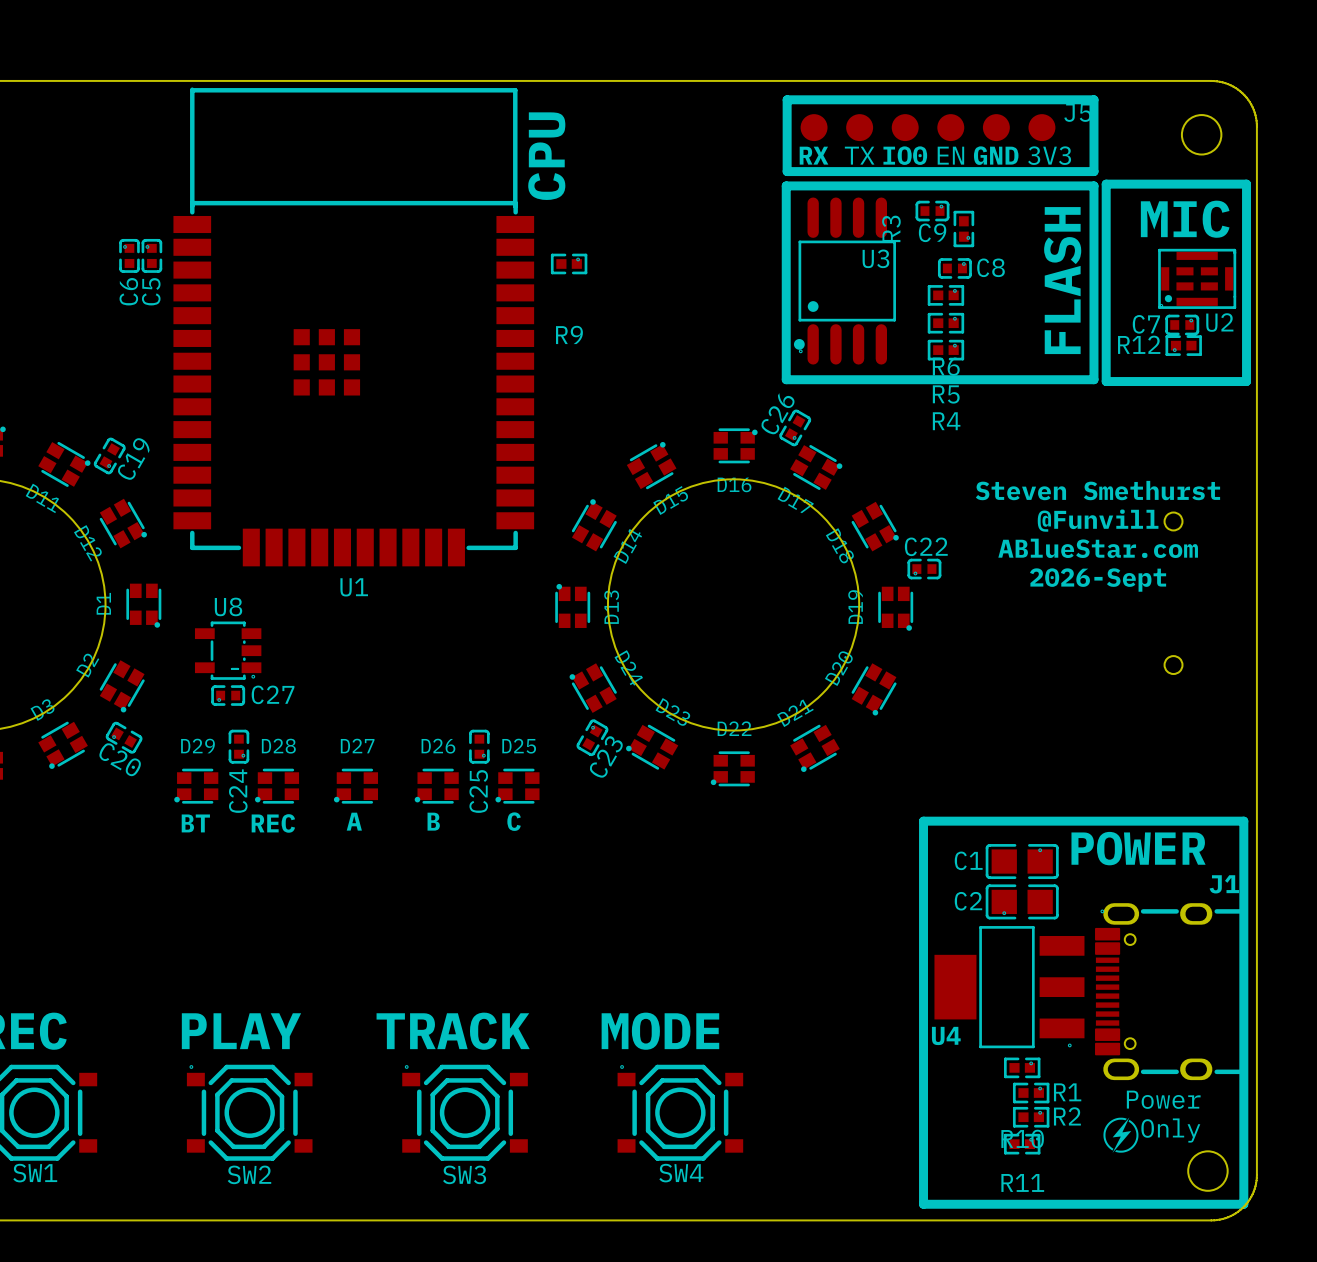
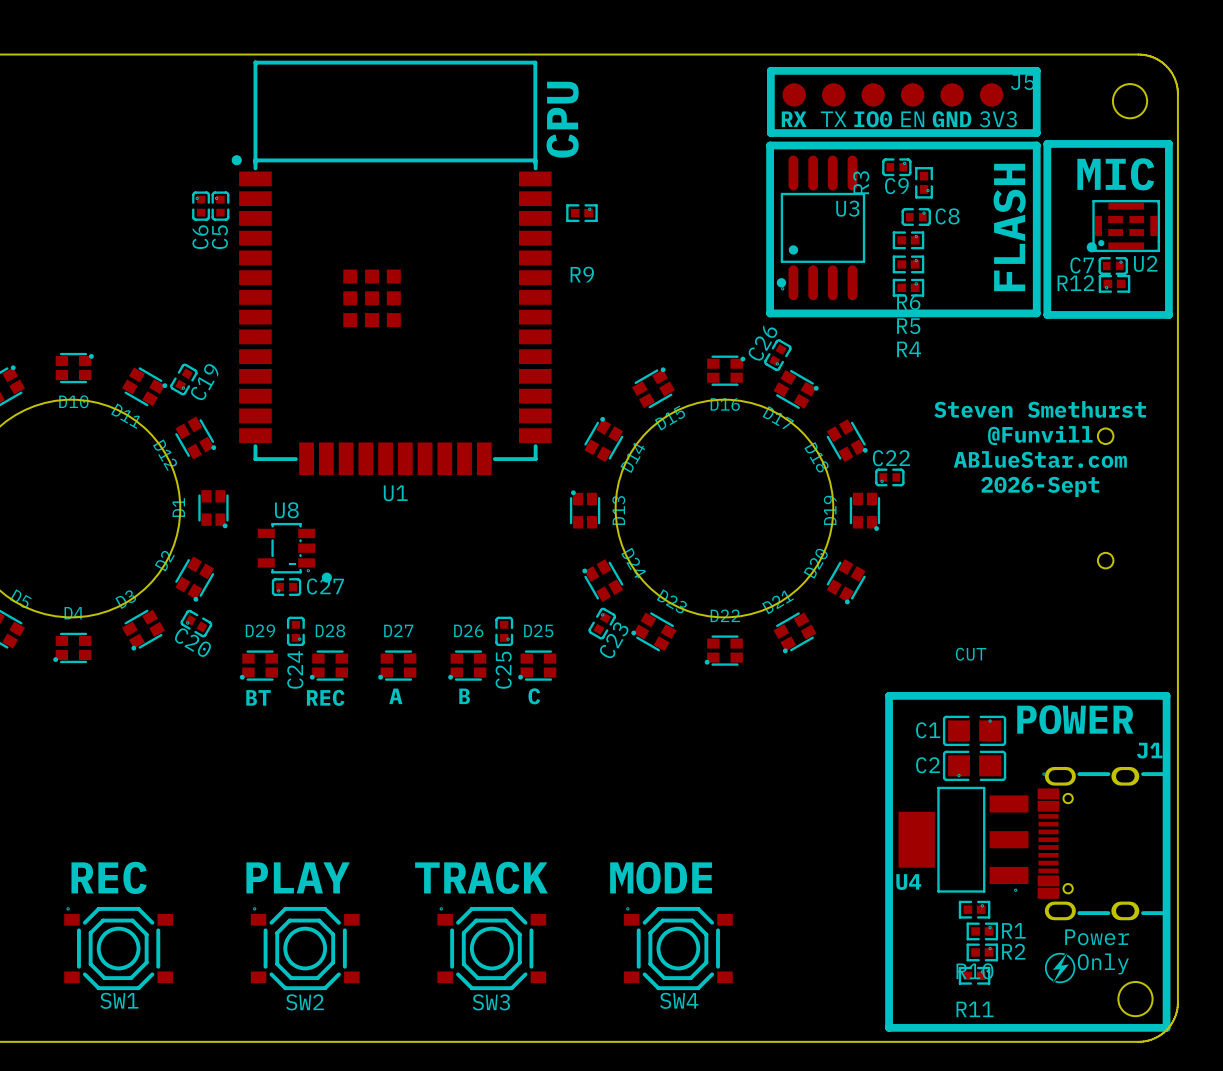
drawing: none -> [231, 155, 242, 166]
drawing: none -> [1086, 242, 1097, 253]
drawing: none -> [321, 572, 332, 583]
text: none -> CUT (971, 654)

